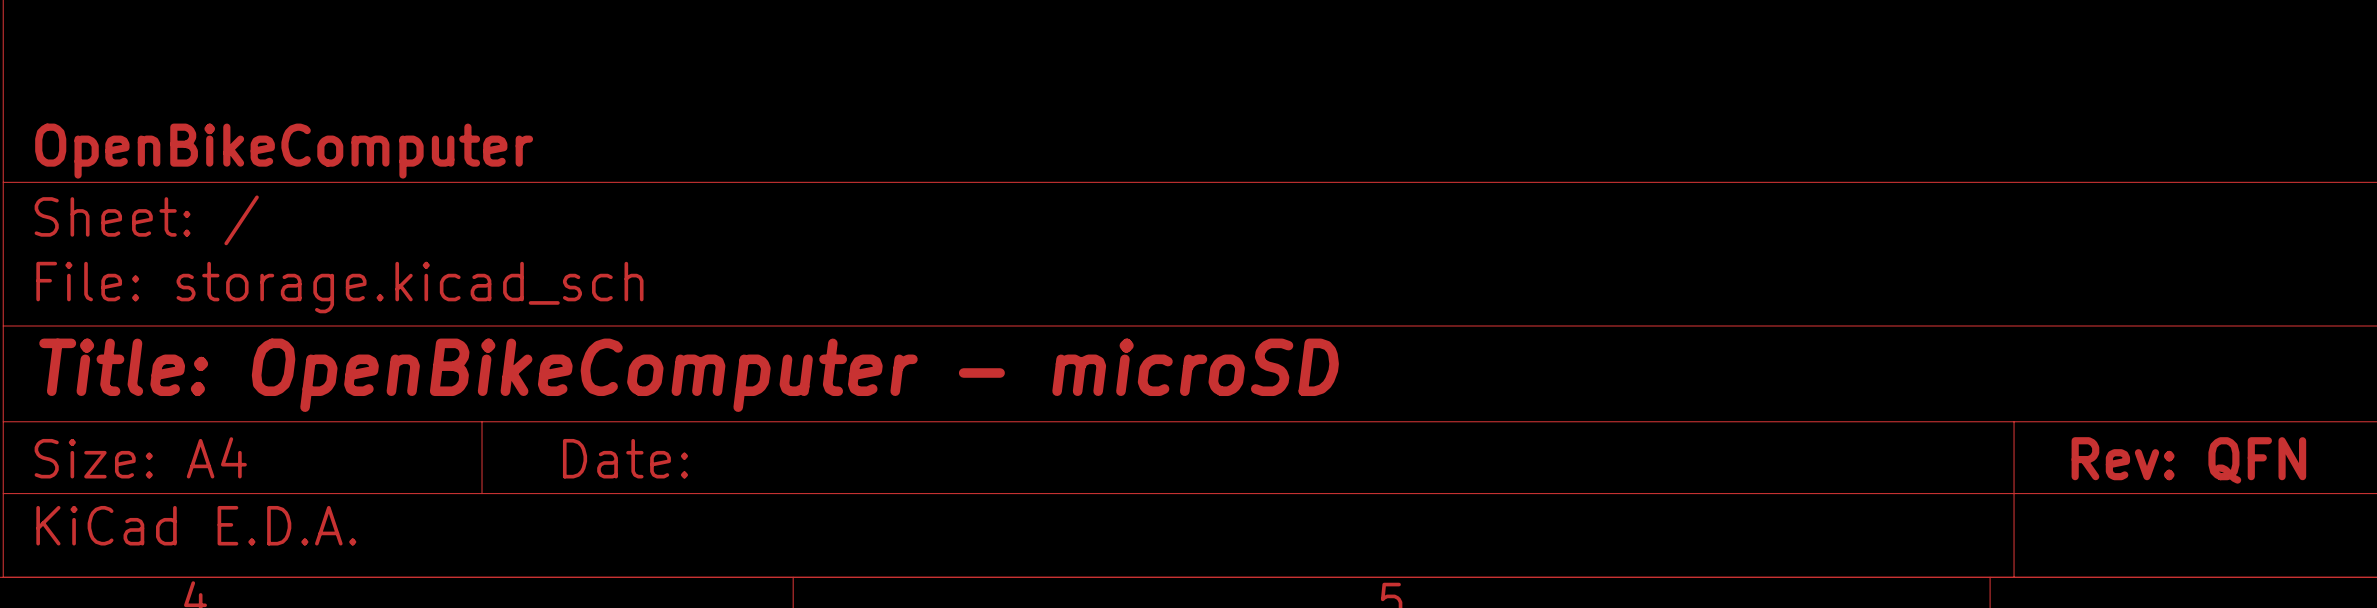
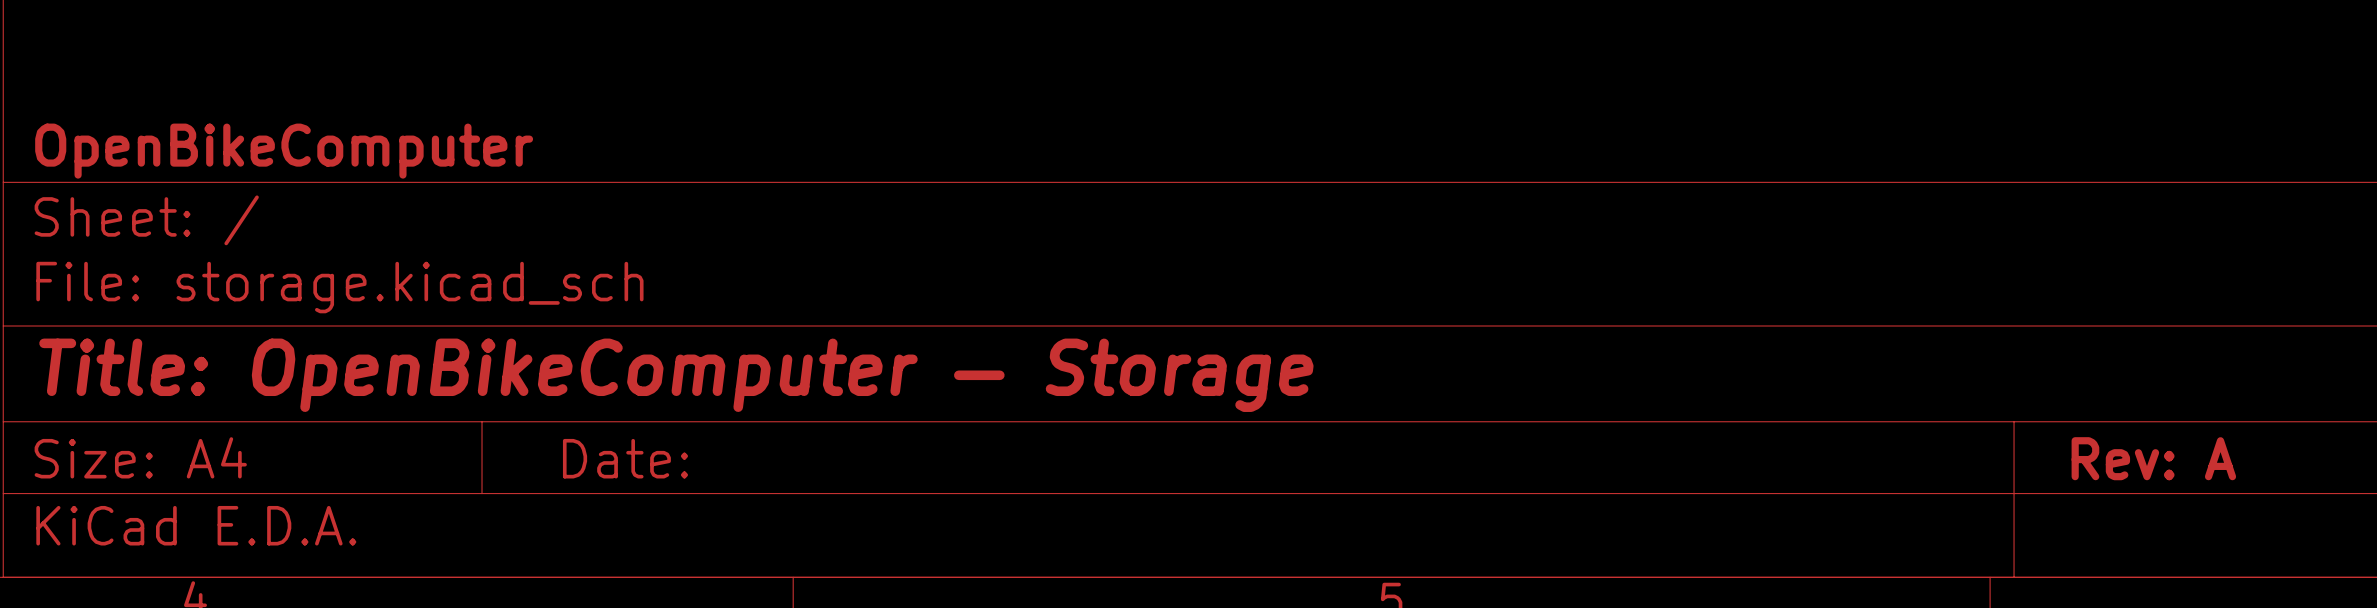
title block: Title: OpenBikeComputer - microSD (689, 375) -> Title: OpenBikeComputer — Storage (676, 375)
title block: Rev: QFN (2188, 460) -> Rev: A (2153, 458)

